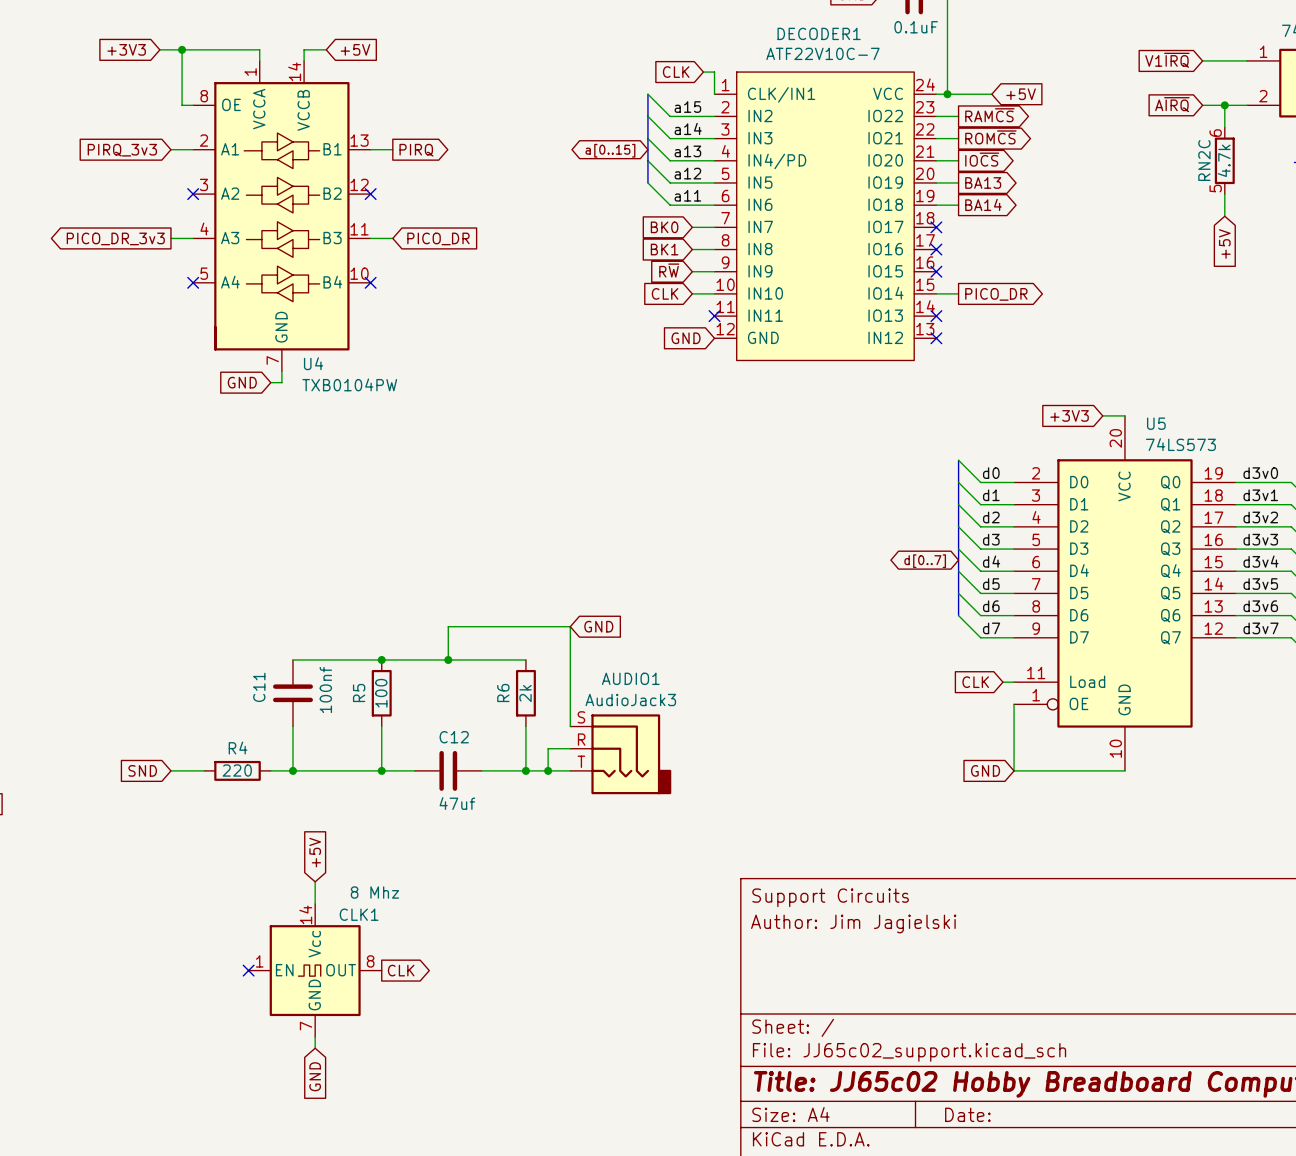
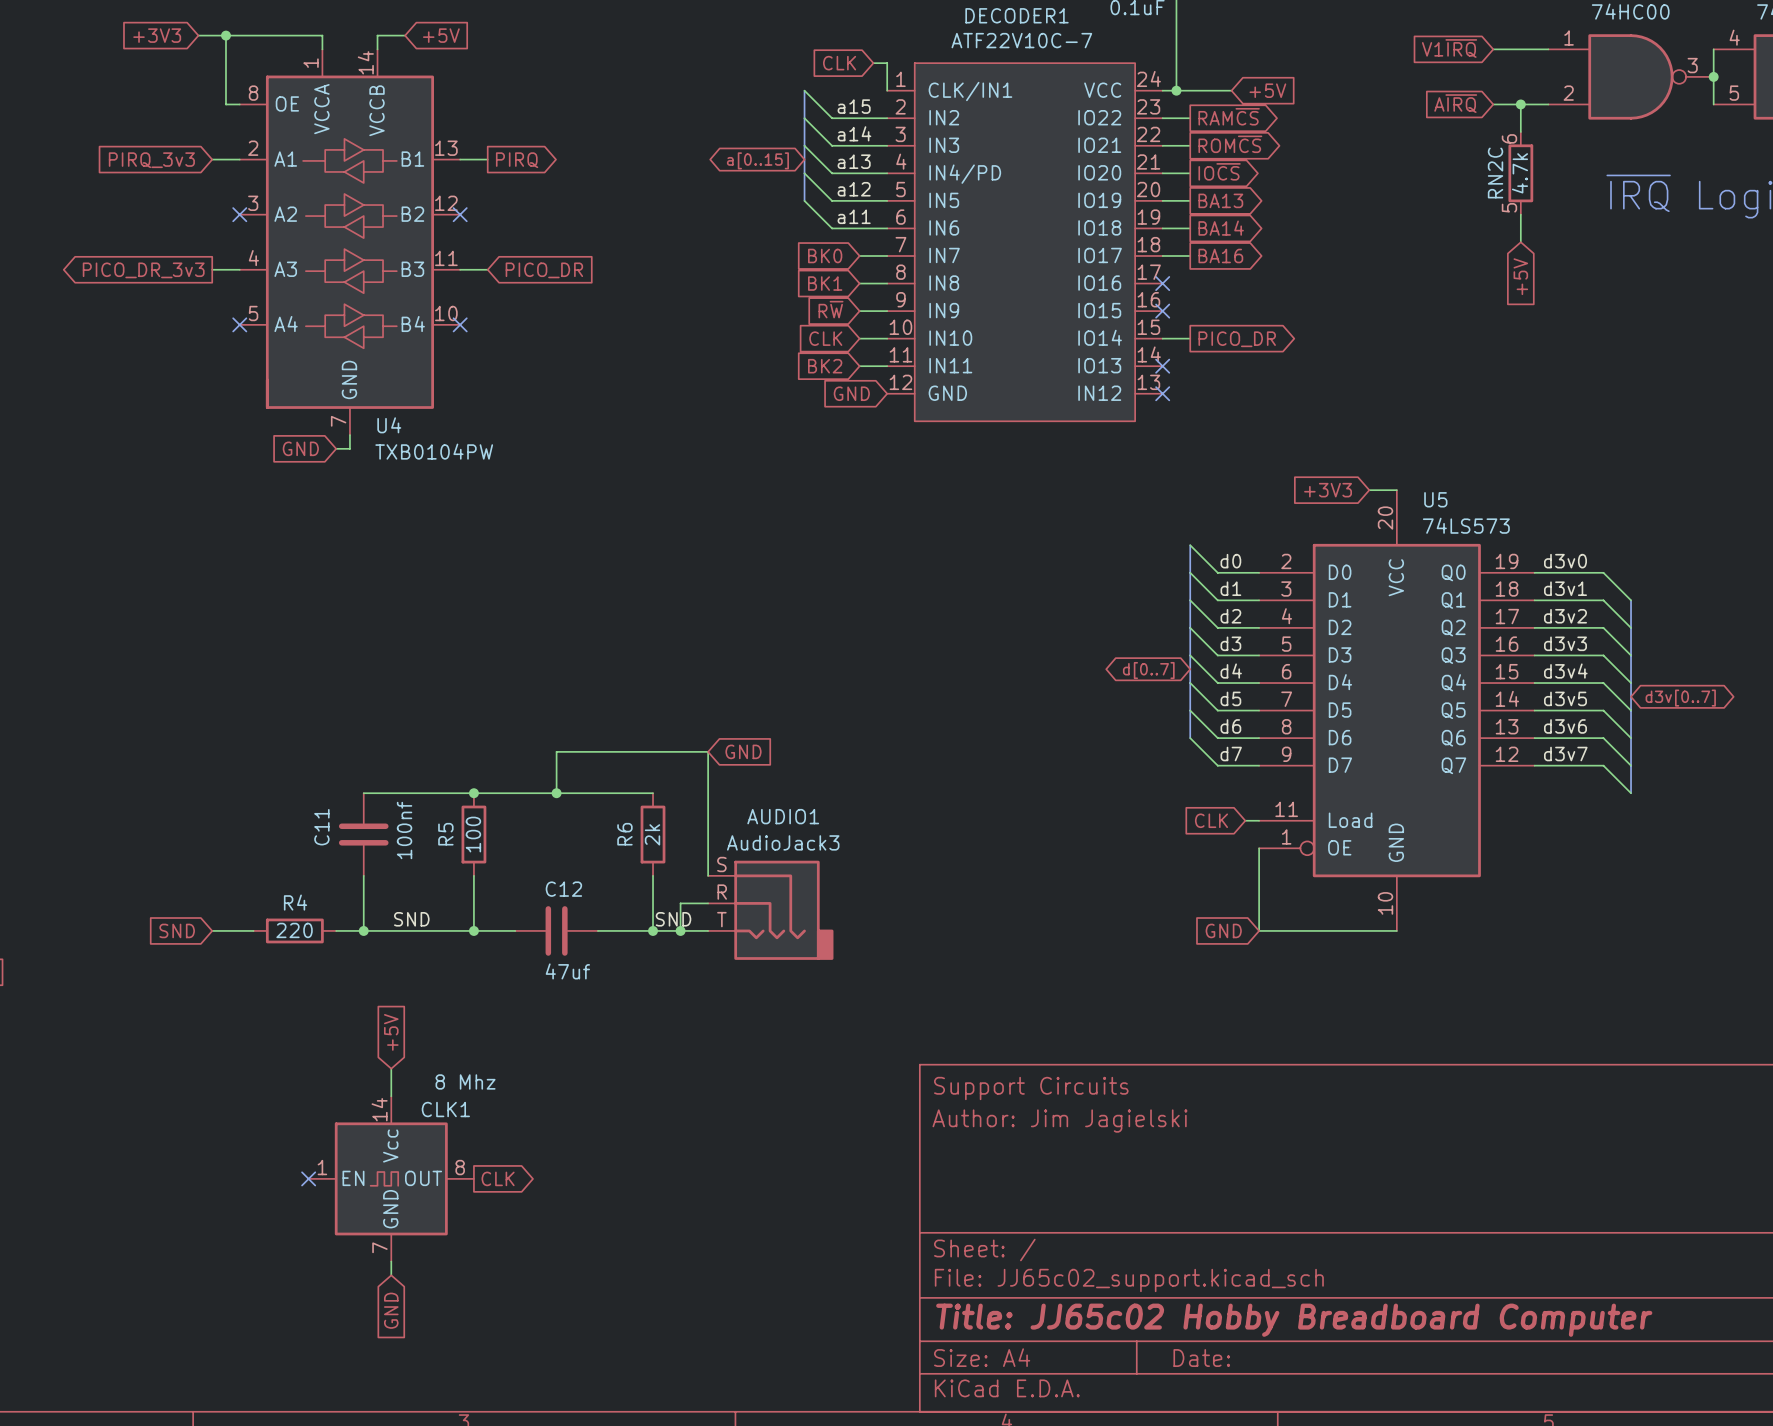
wire: none -> (1162, 255) (1190, 255)
no-connect mark: (936, 227) -> none
global label: none -> BA16 (1220, 255)
global label: none -> BK2 (825, 366)
wire: none -> (859, 366) (887, 366)
no-connect mark: (714, 316) -> none
label: none -> SND (411, 919)
label: none -> SND (673, 919)

